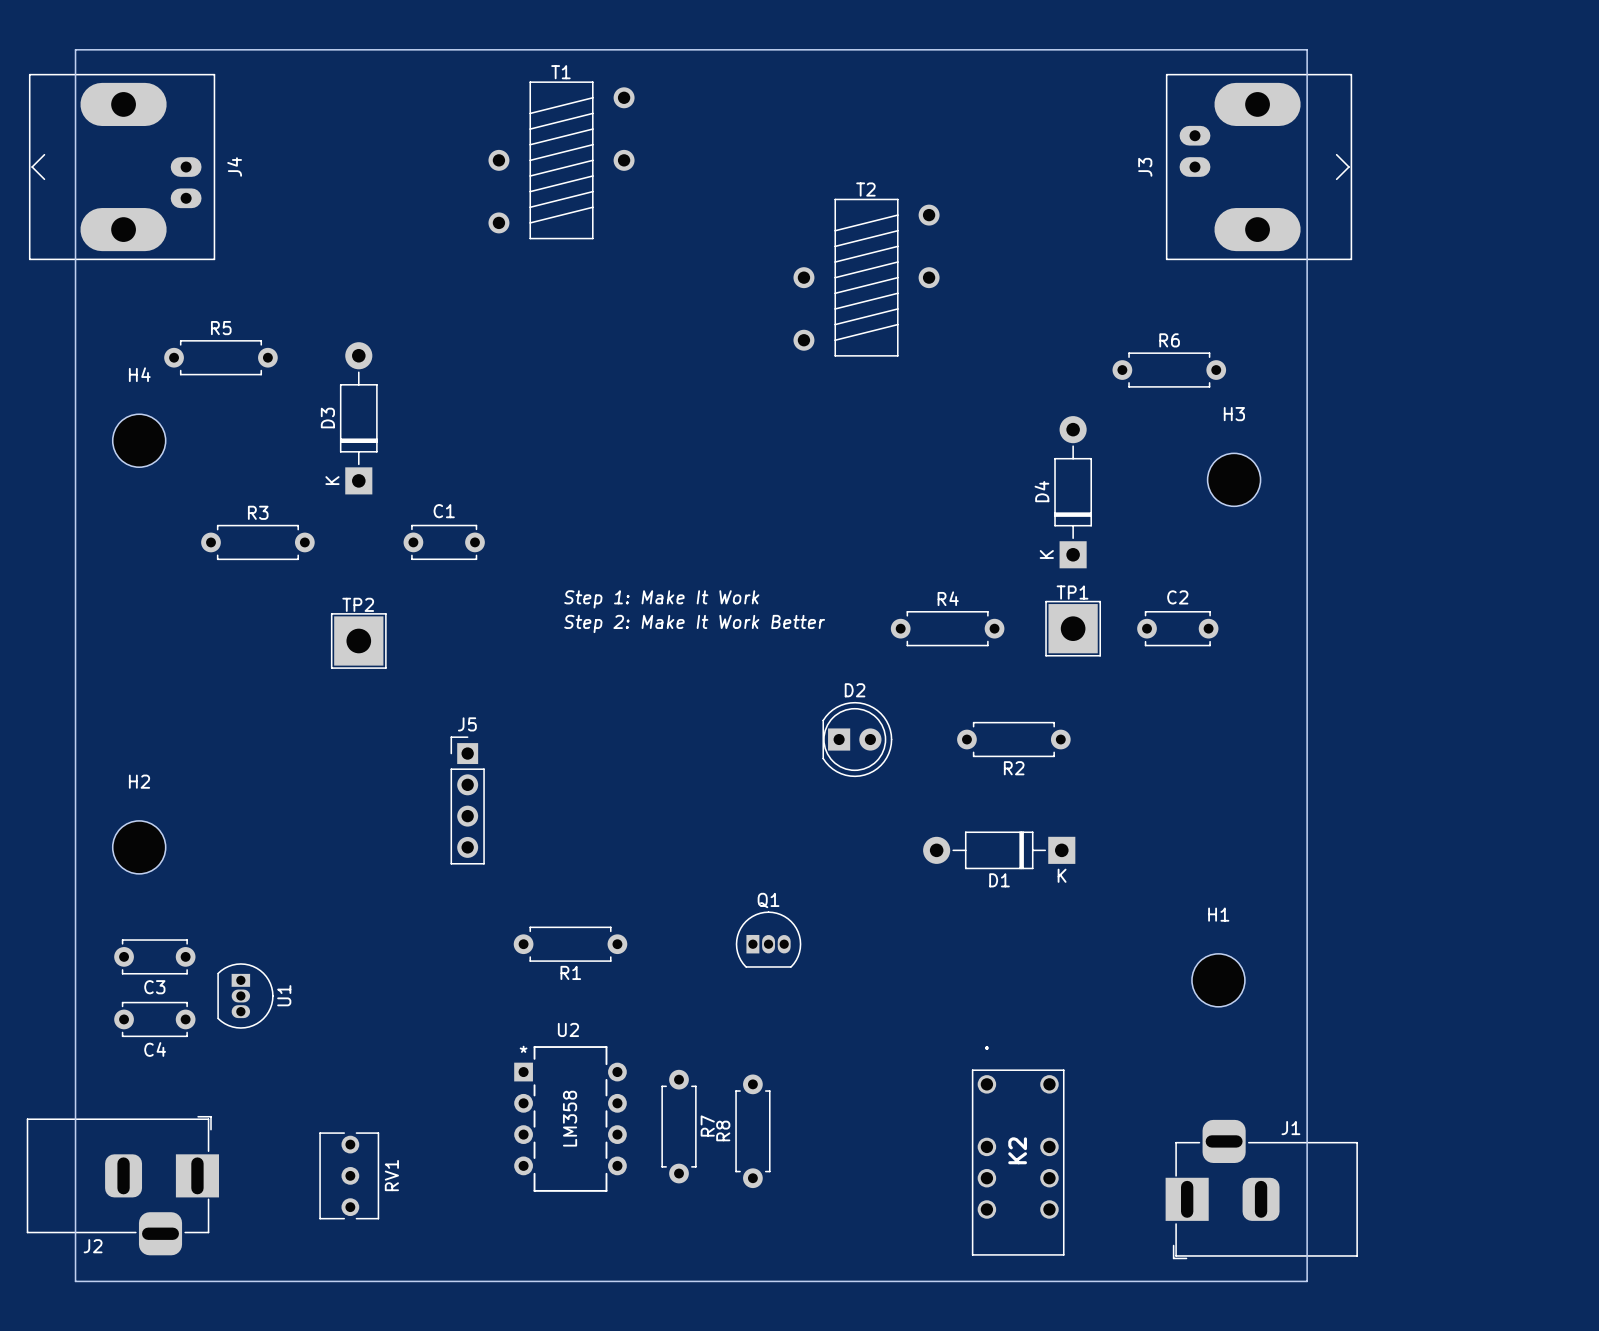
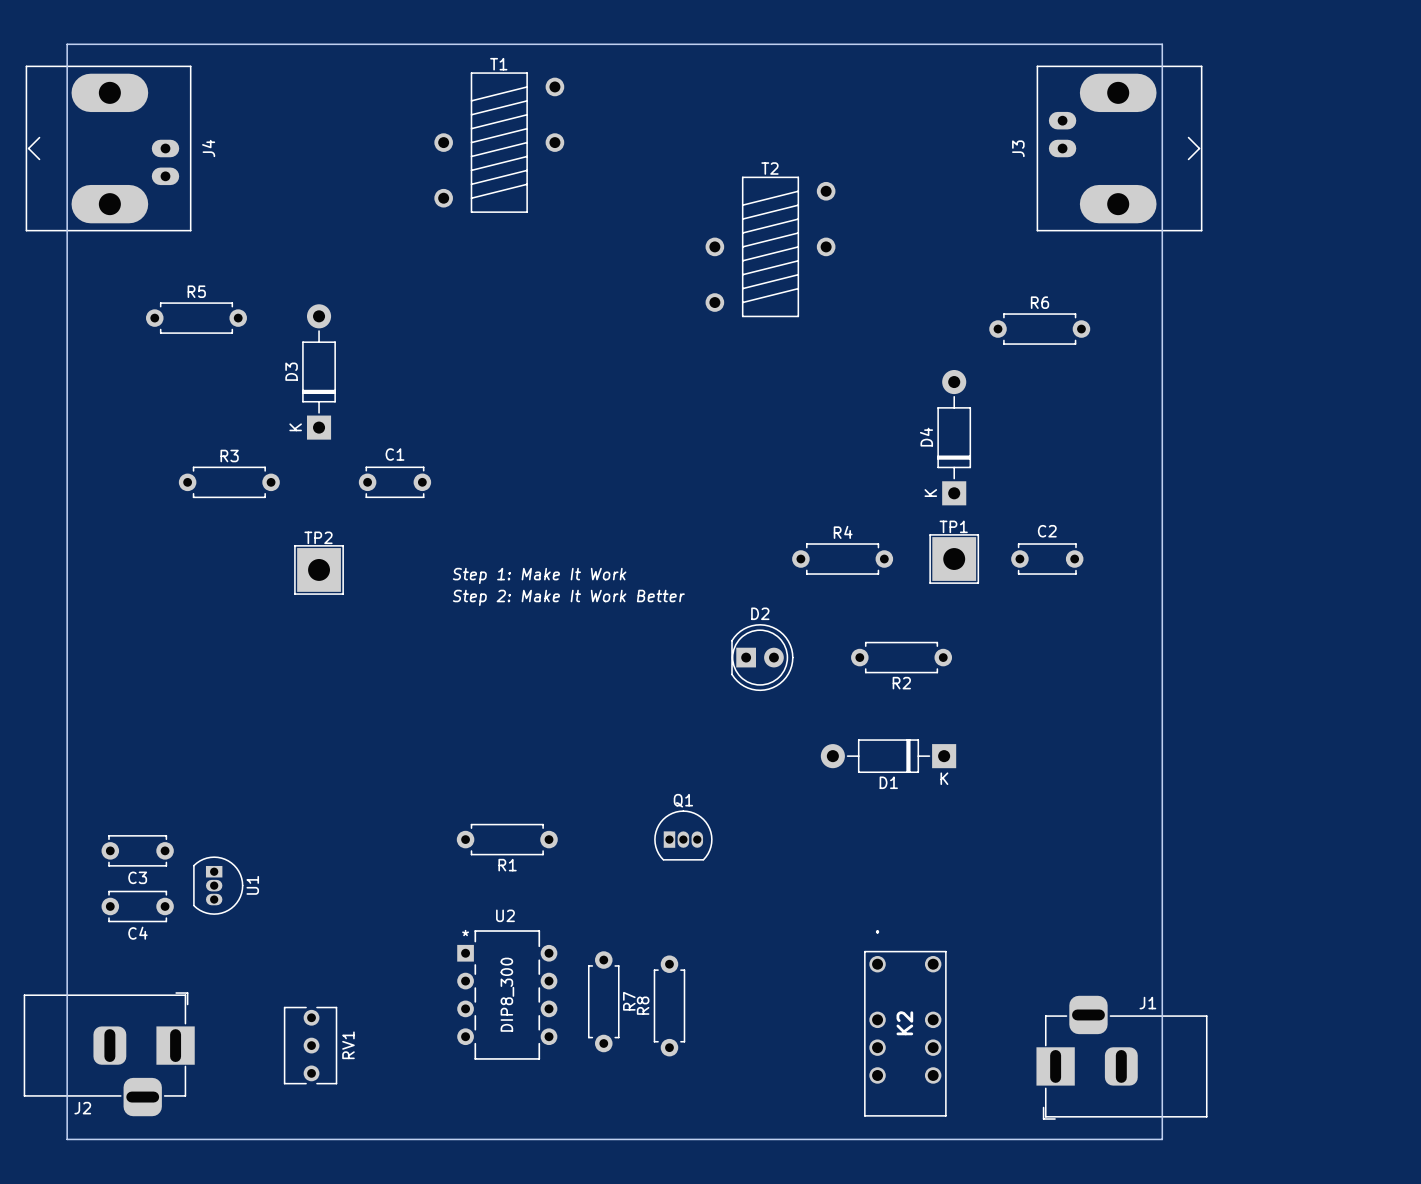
H4: (139, 440) -> none
H3: (1234, 479) -> none
text position: Step 1: Make It Work (661, 599) -> Step 1: Make It Work (539, 575)
text position: Step 2: Make It Work Better (694, 623) -> Step 2: Make It Work Better (568, 597)
J5: (467, 800) -> none
H2: (139, 847) -> none
H1: (1218, 980) -> none
U2 value: LM358 (570, 1118) -> DIP8_300 (507, 994)

